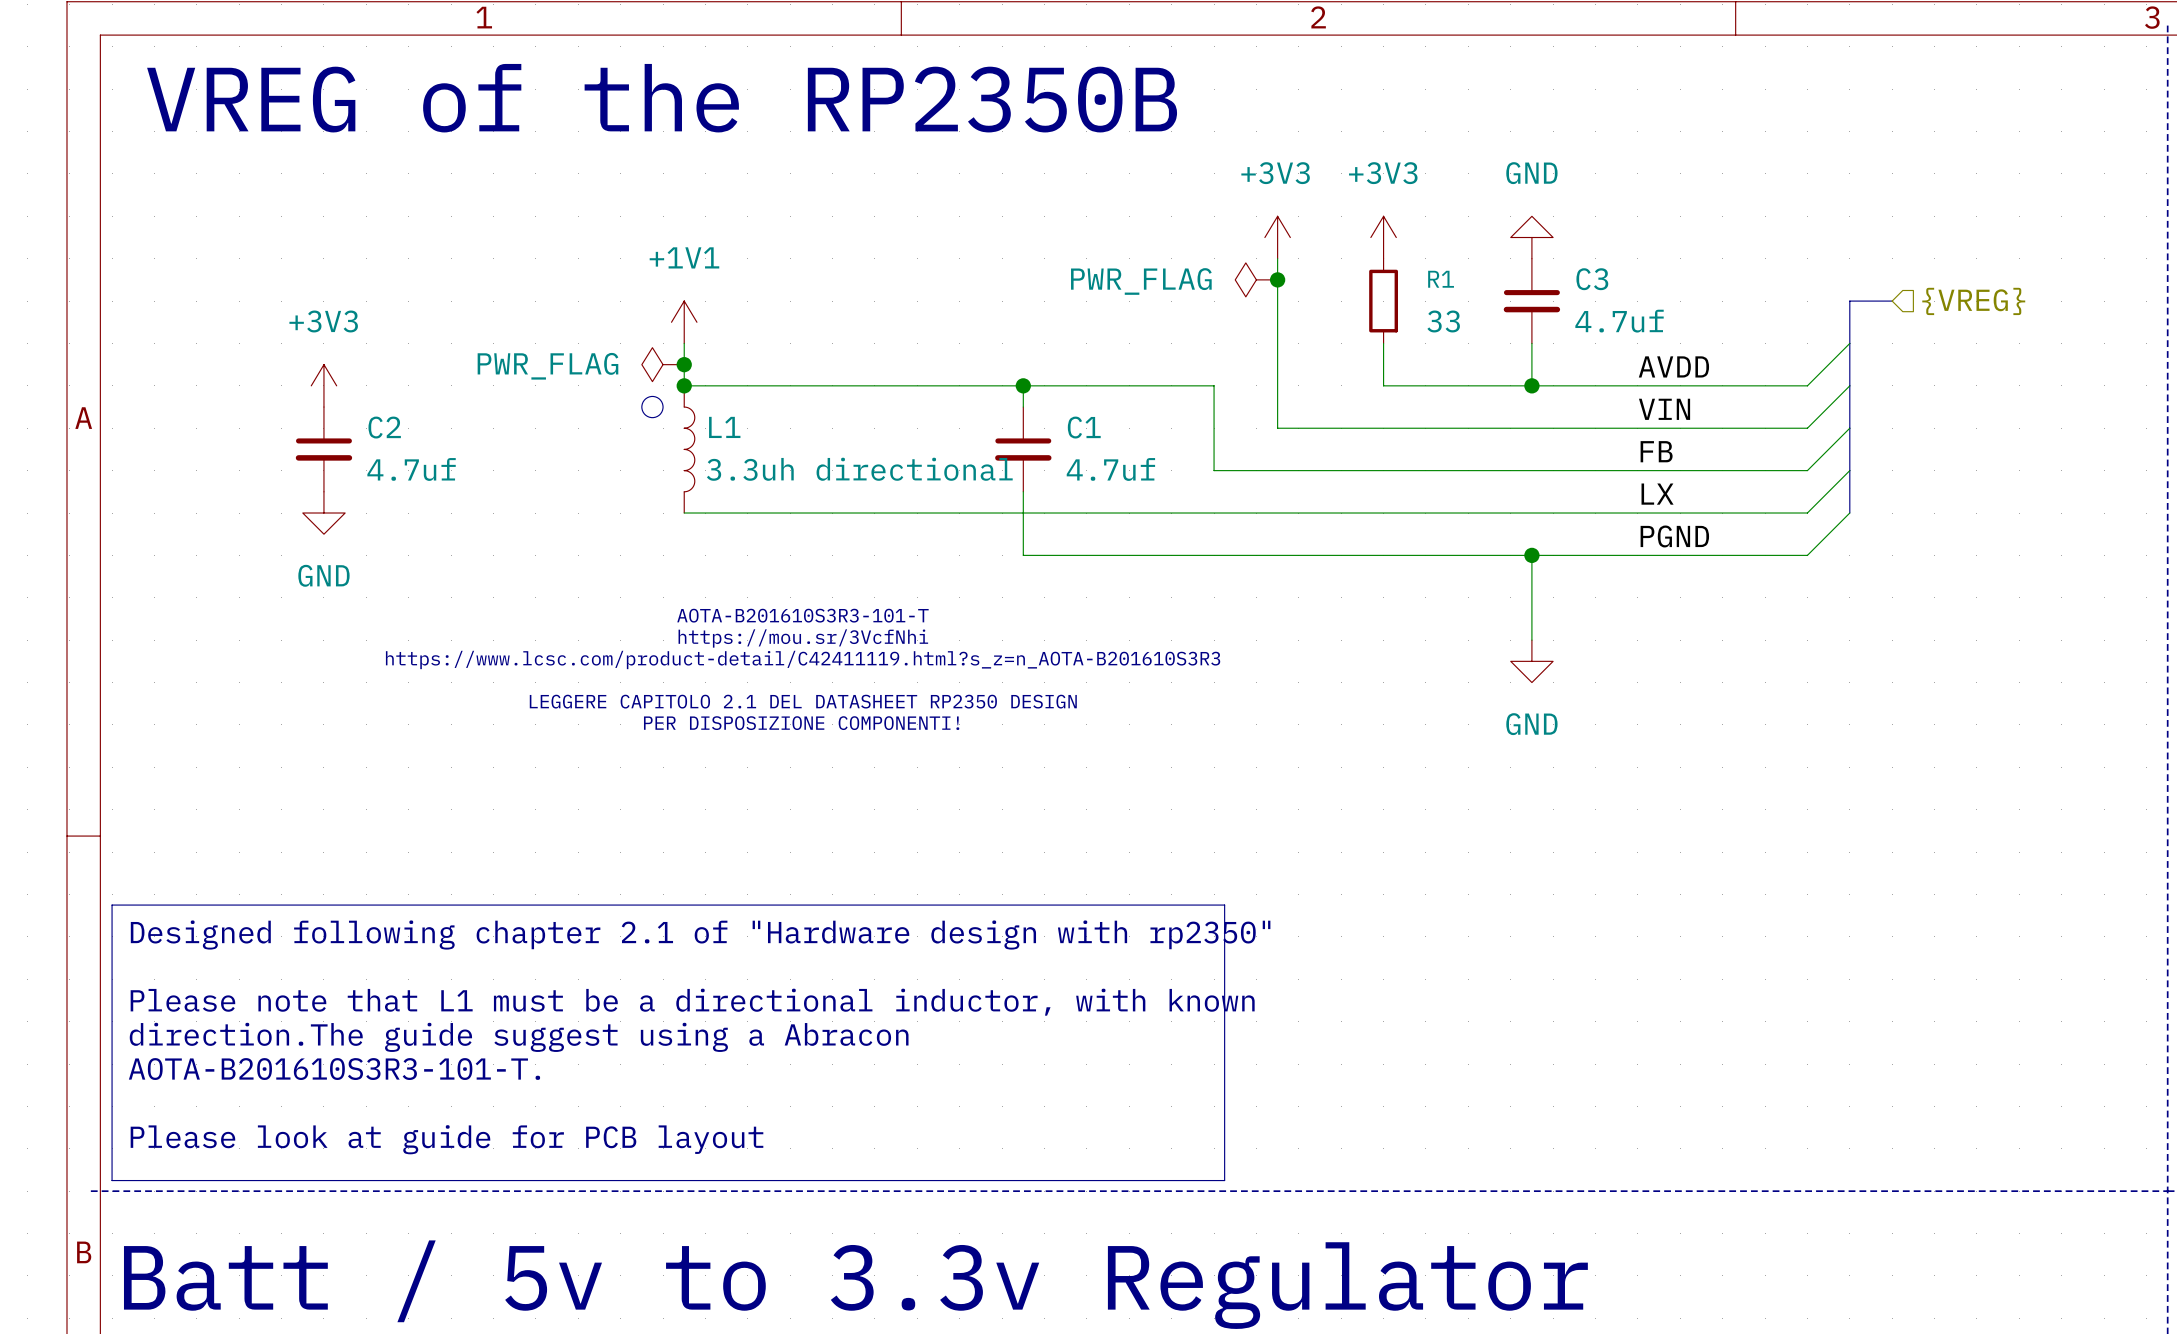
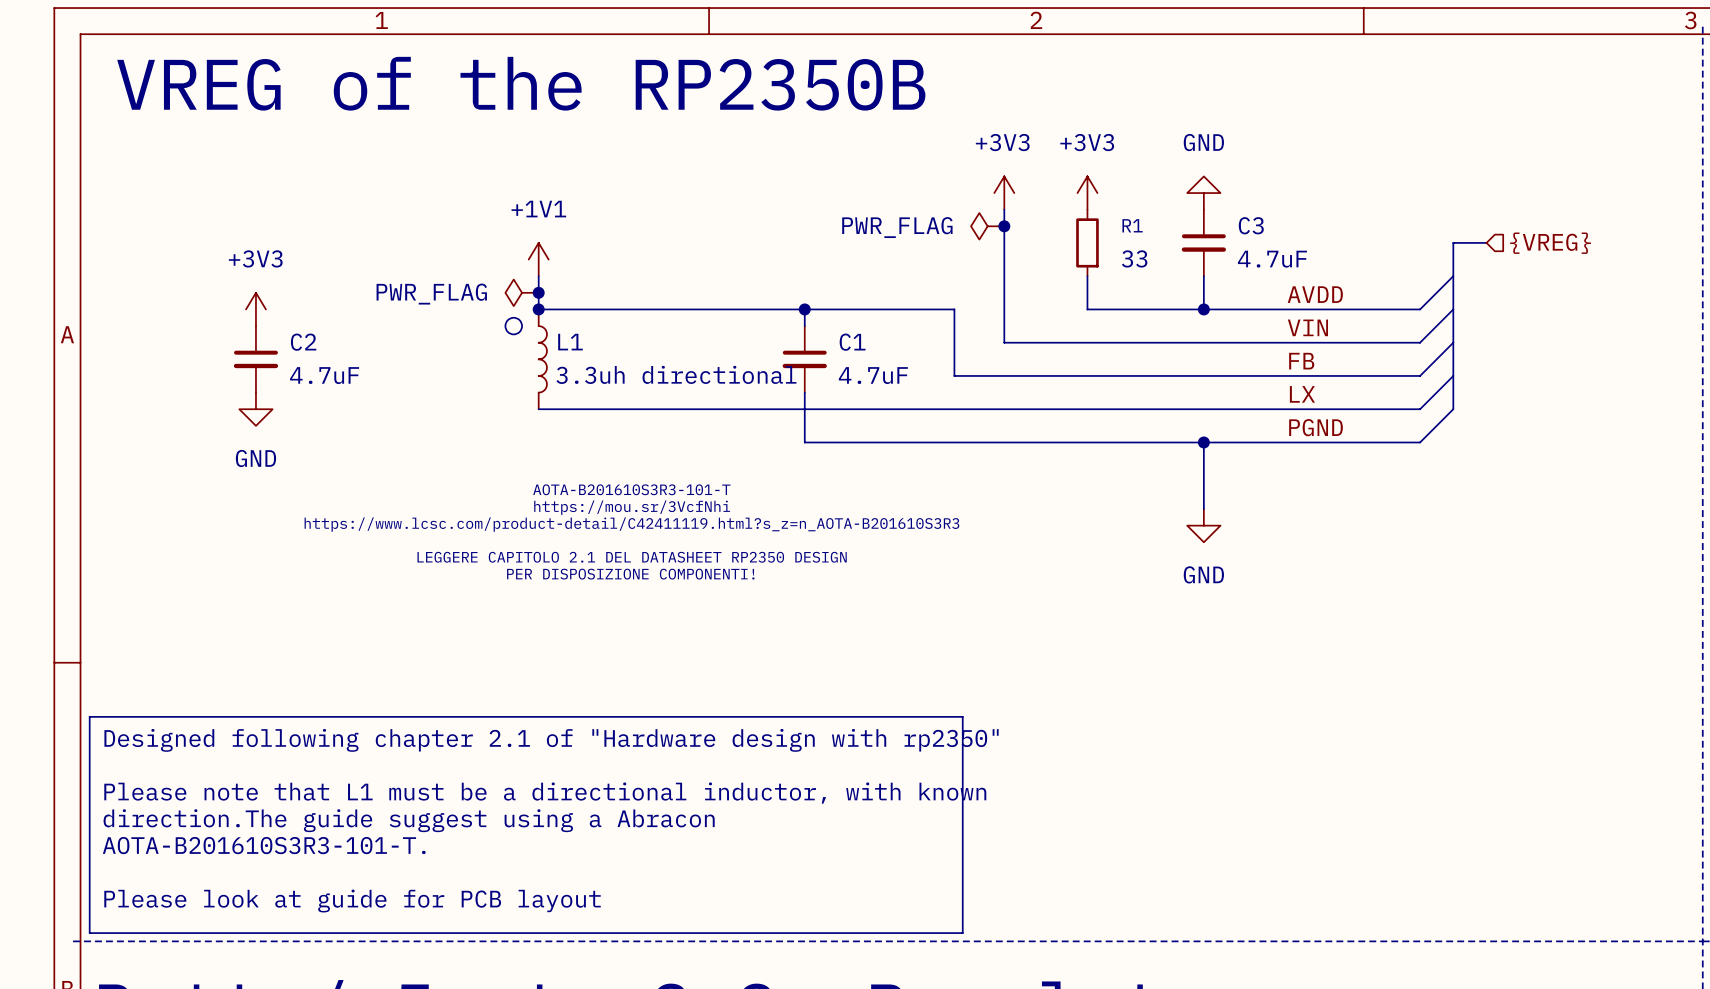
C3 value: 4.7uf (1619, 321) -> 4.7uF (1272, 259)
C2 value: 4.7uf (411, 469) -> 4.7uF (324, 375)
C1 value: 4.7uf (1110, 469) -> 4.7uF (873, 375)

